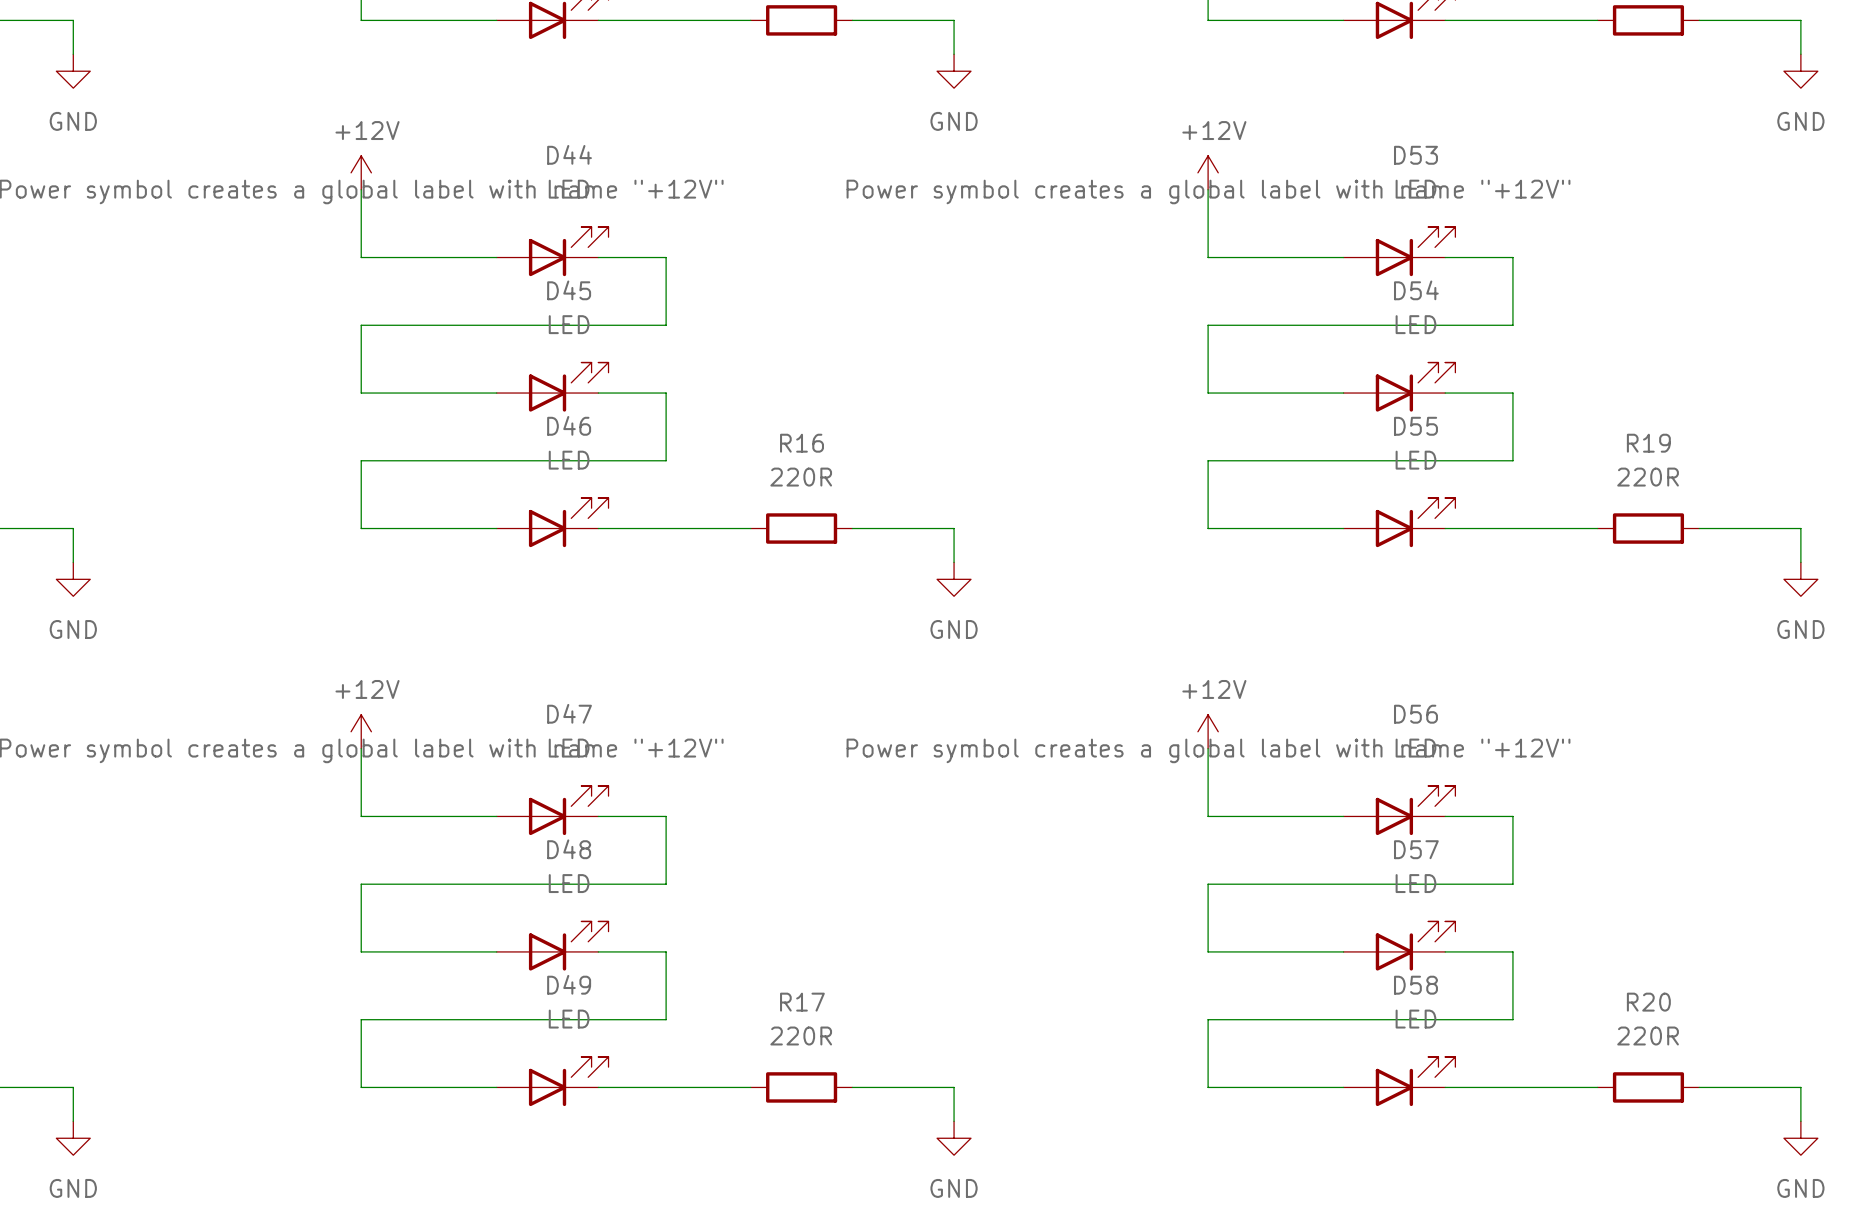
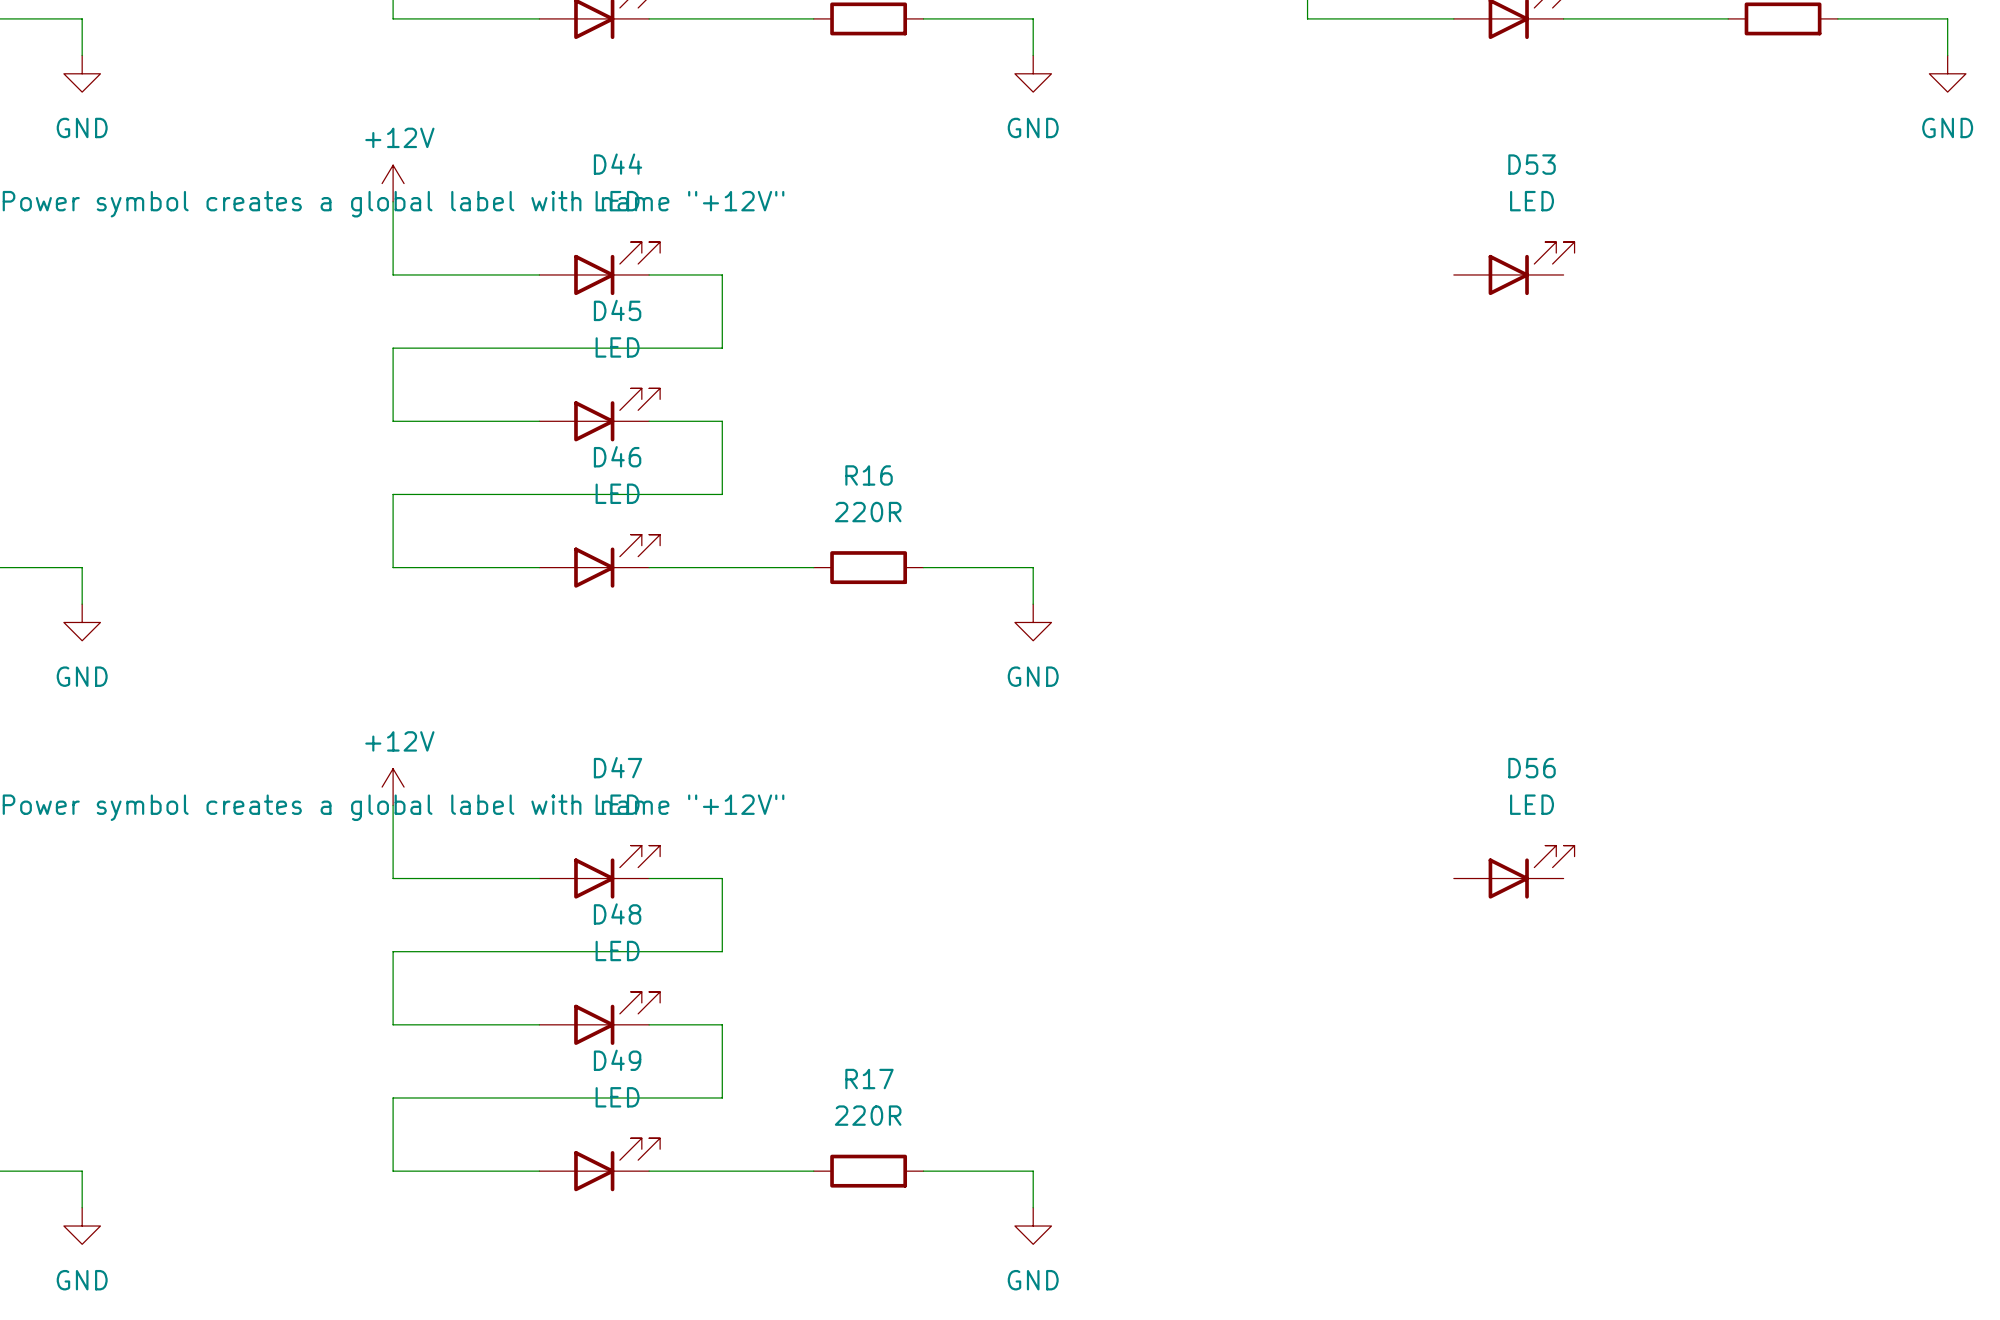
power symbol: +12V (1208, 172) -> none
wire: (1208, 189) (1208, 257) (1343, 257) -> none
wire: (1445, 257) (1512, 257) (1512, 325) (1208, 325) (1208, 393) (1343, 393) -> none
D54: LED (1399, 387) -> none
wire: (1445, 393) (1512, 393) (1512, 460) (1208, 460) (1208, 528) (1343, 528) -> none
D55: LED (1399, 522) -> none
wire: (1445, 528) (1597, 528) -> none
R19: 220R (1648, 528) -> none
wire: (1699, 528) (1800, 528) (1800, 562) -> none
power symbol: GND (1800, 579) -> none
power symbol: +12V (1208, 731) -> none
wire: (1208, 748) (1208, 816) (1343, 816) -> none
wire: (1445, 816) (1512, 816) (1512, 884) (1208, 884) (1208, 951) (1343, 951) -> none
D57: LED (1399, 946) -> none
wire: (1445, 951) (1512, 951) (1512, 1019) (1208, 1019) (1208, 1087) (1343, 1087) -> none
D58: LED (1399, 1081) -> none
wire: (1445, 1087) (1597, 1087) -> none
R20: 220R (1648, 1087) -> none
wire: (1699, 1087) (1800, 1087) (1800, 1121) -> none
power symbol: GND (1800, 1138) -> none

